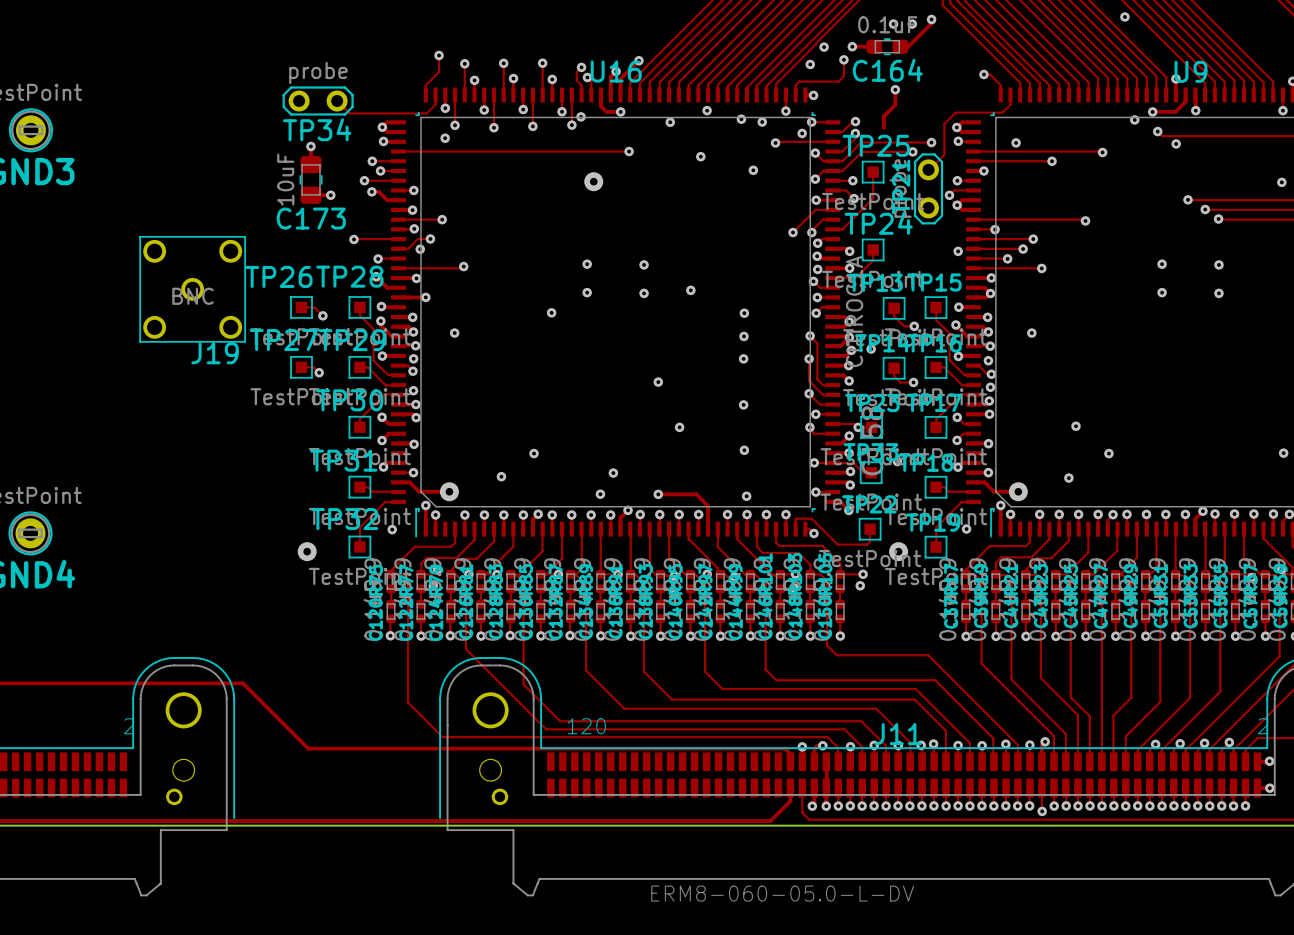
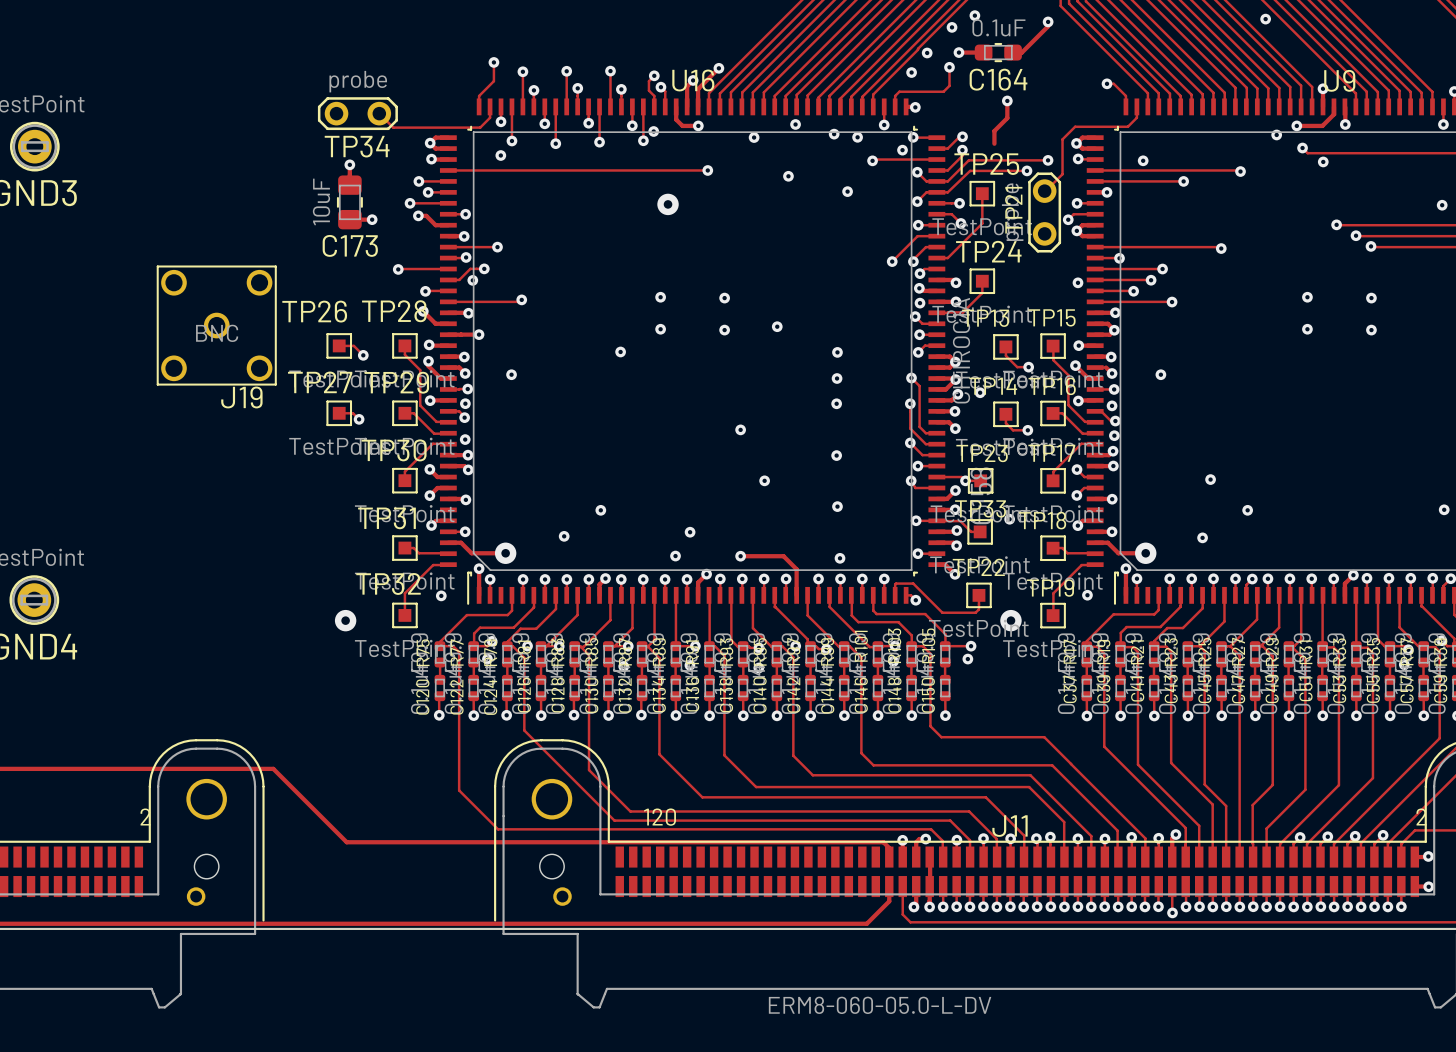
via: none -> (974, 15)
via: none -> (952, 27)
via: (893, 24) -> none
via: (912, 24) -> none

